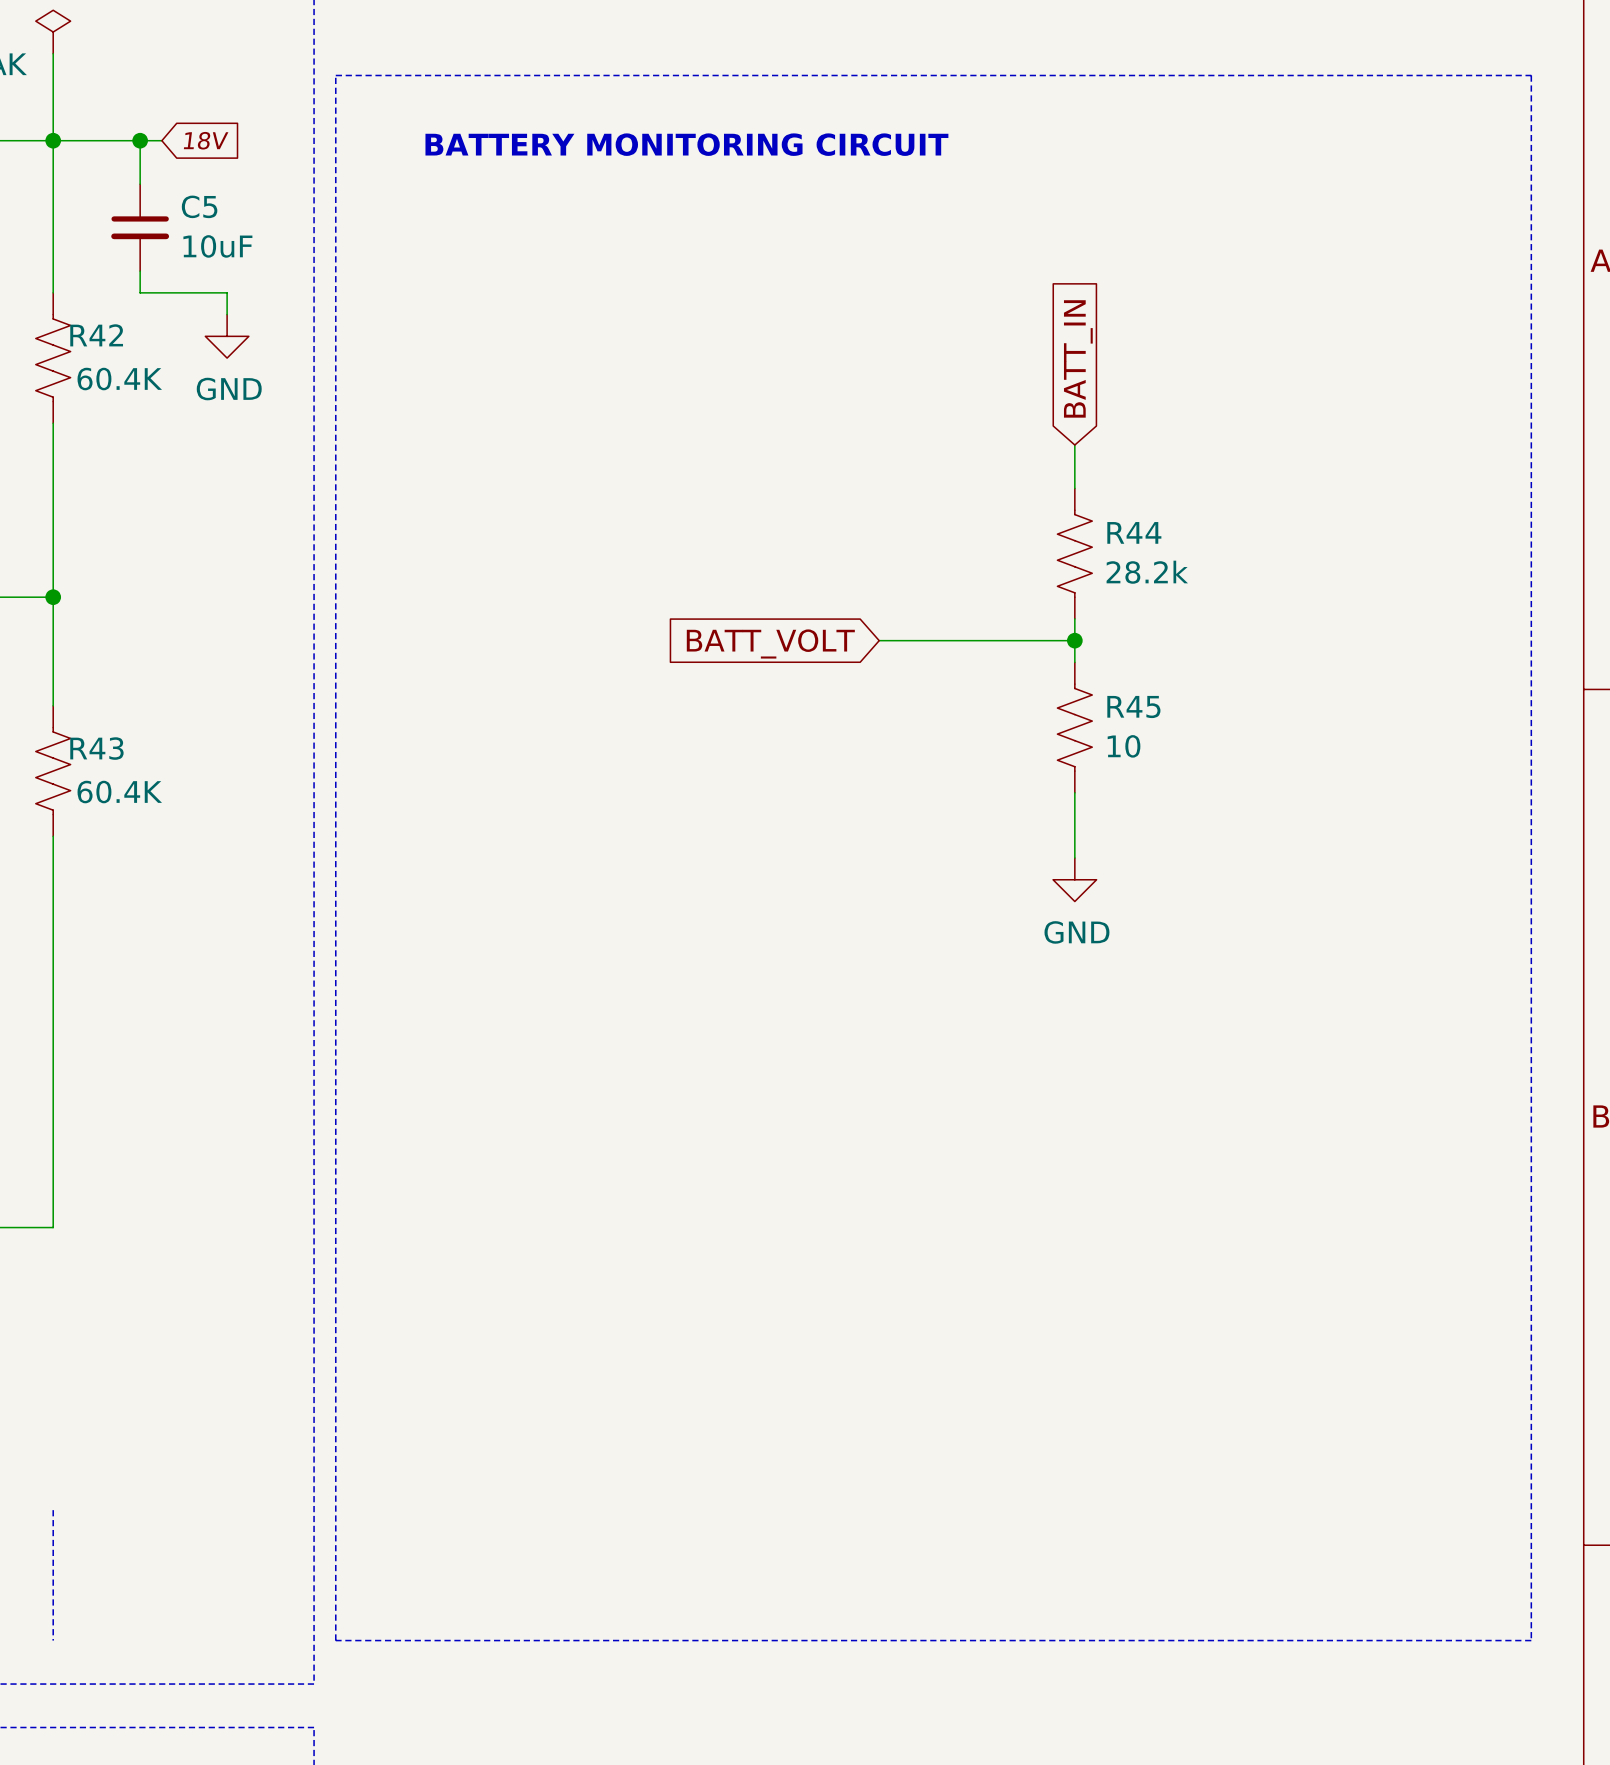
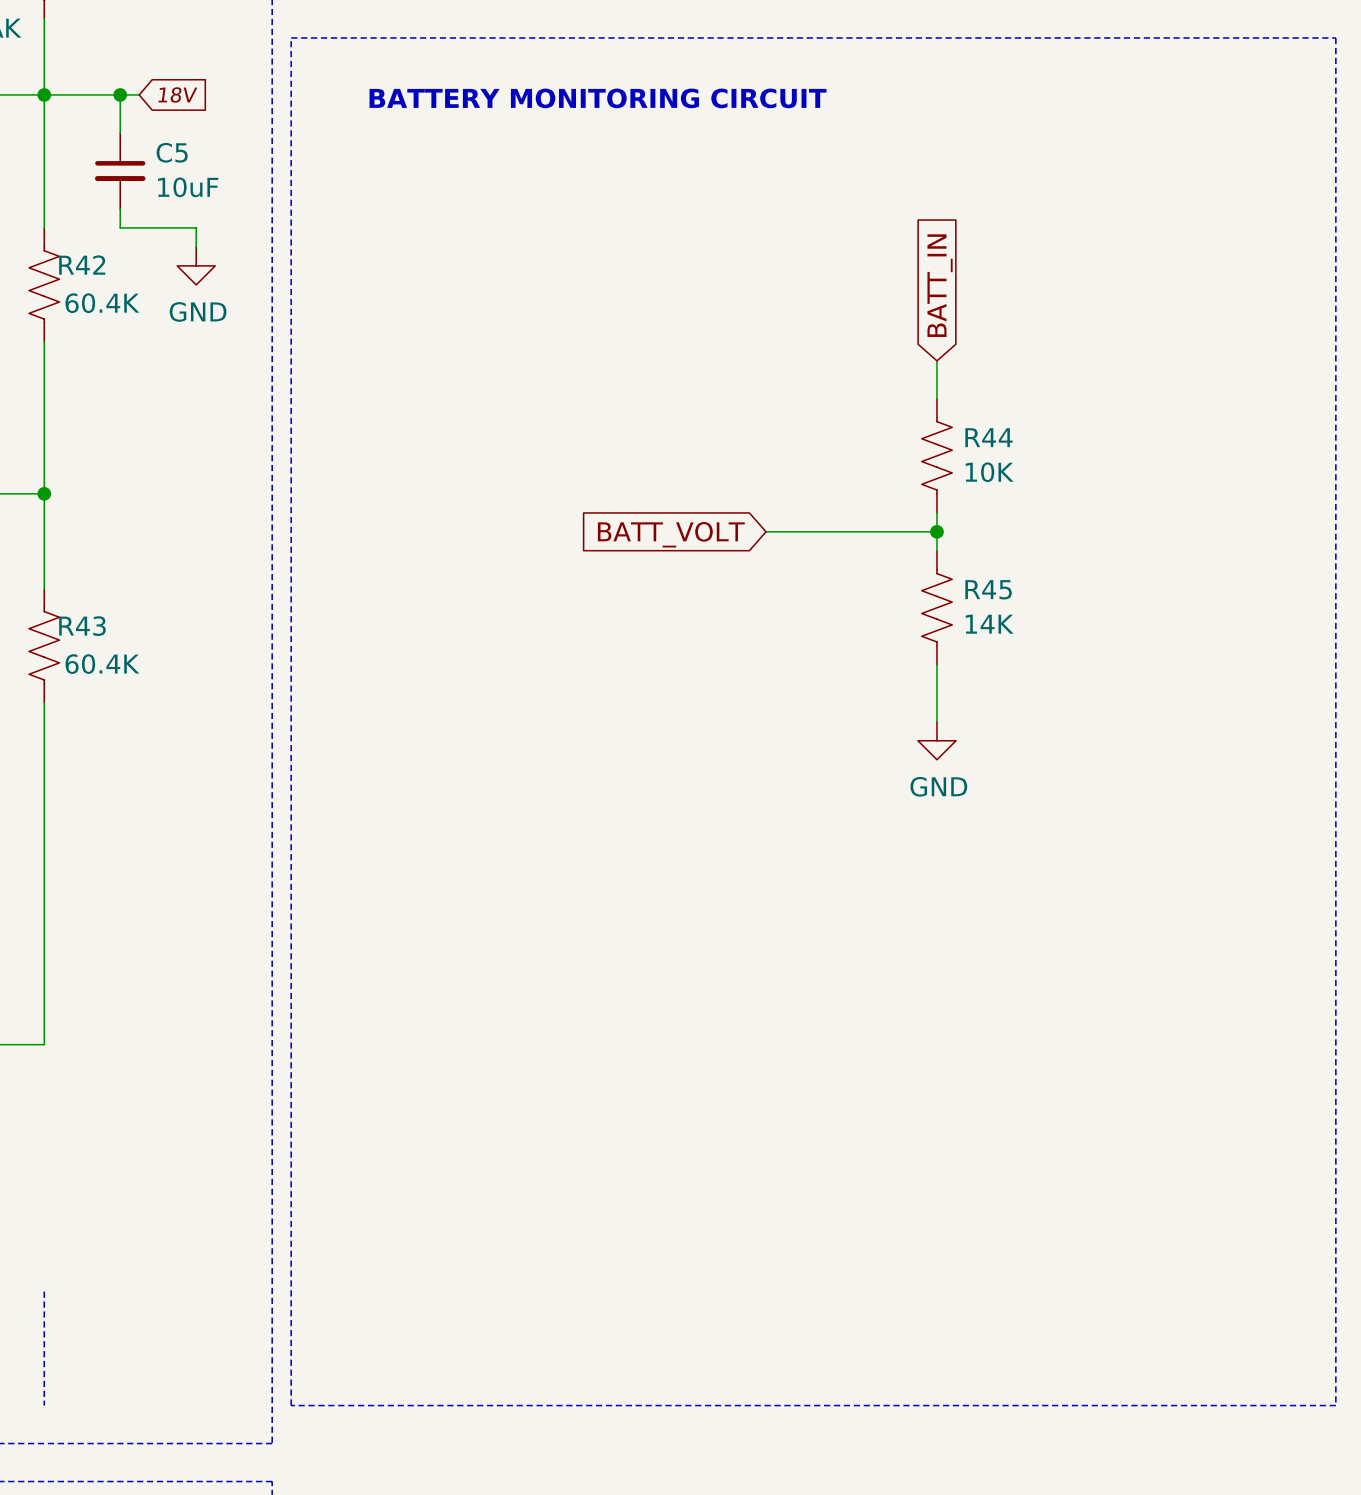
R44 value: 28.2k (1147, 572) -> 10K (989, 472)
R45 value: 10 (1124, 746) -> 14K (989, 624)

